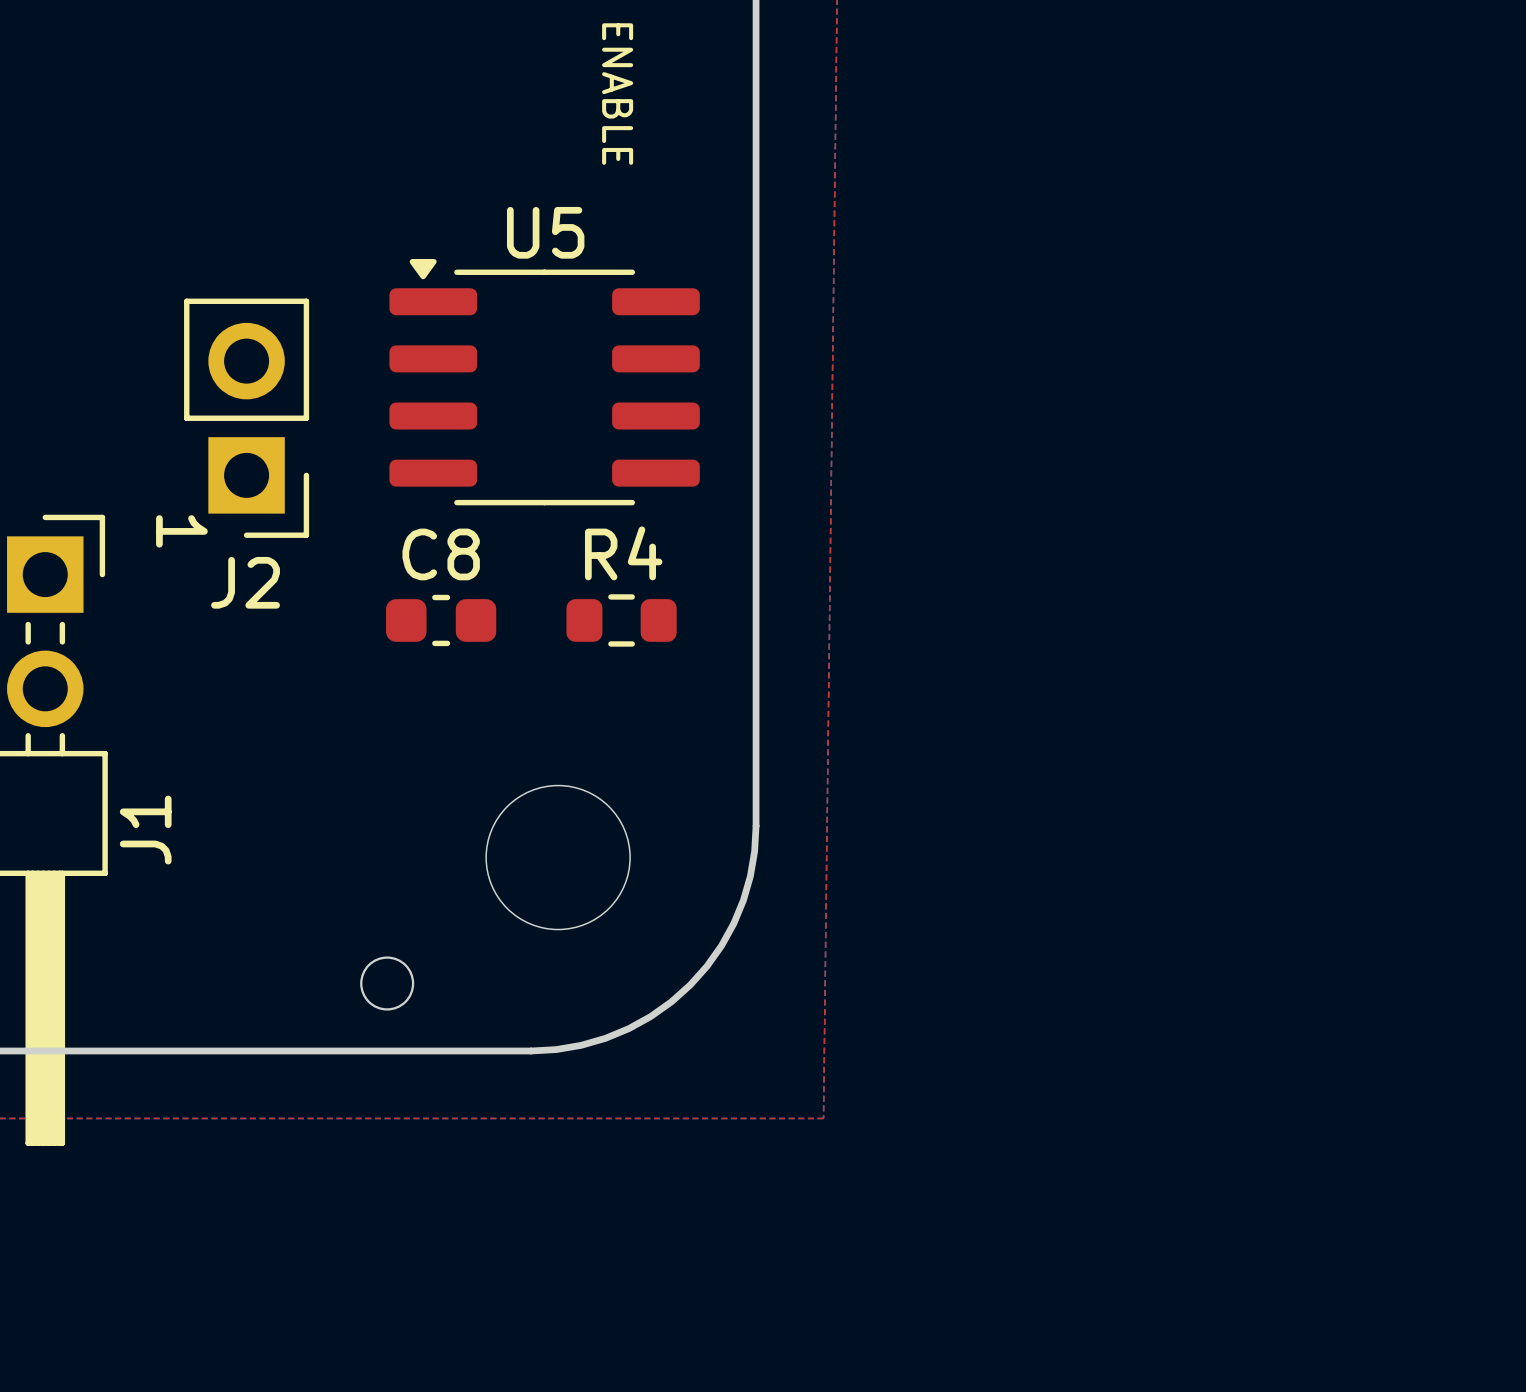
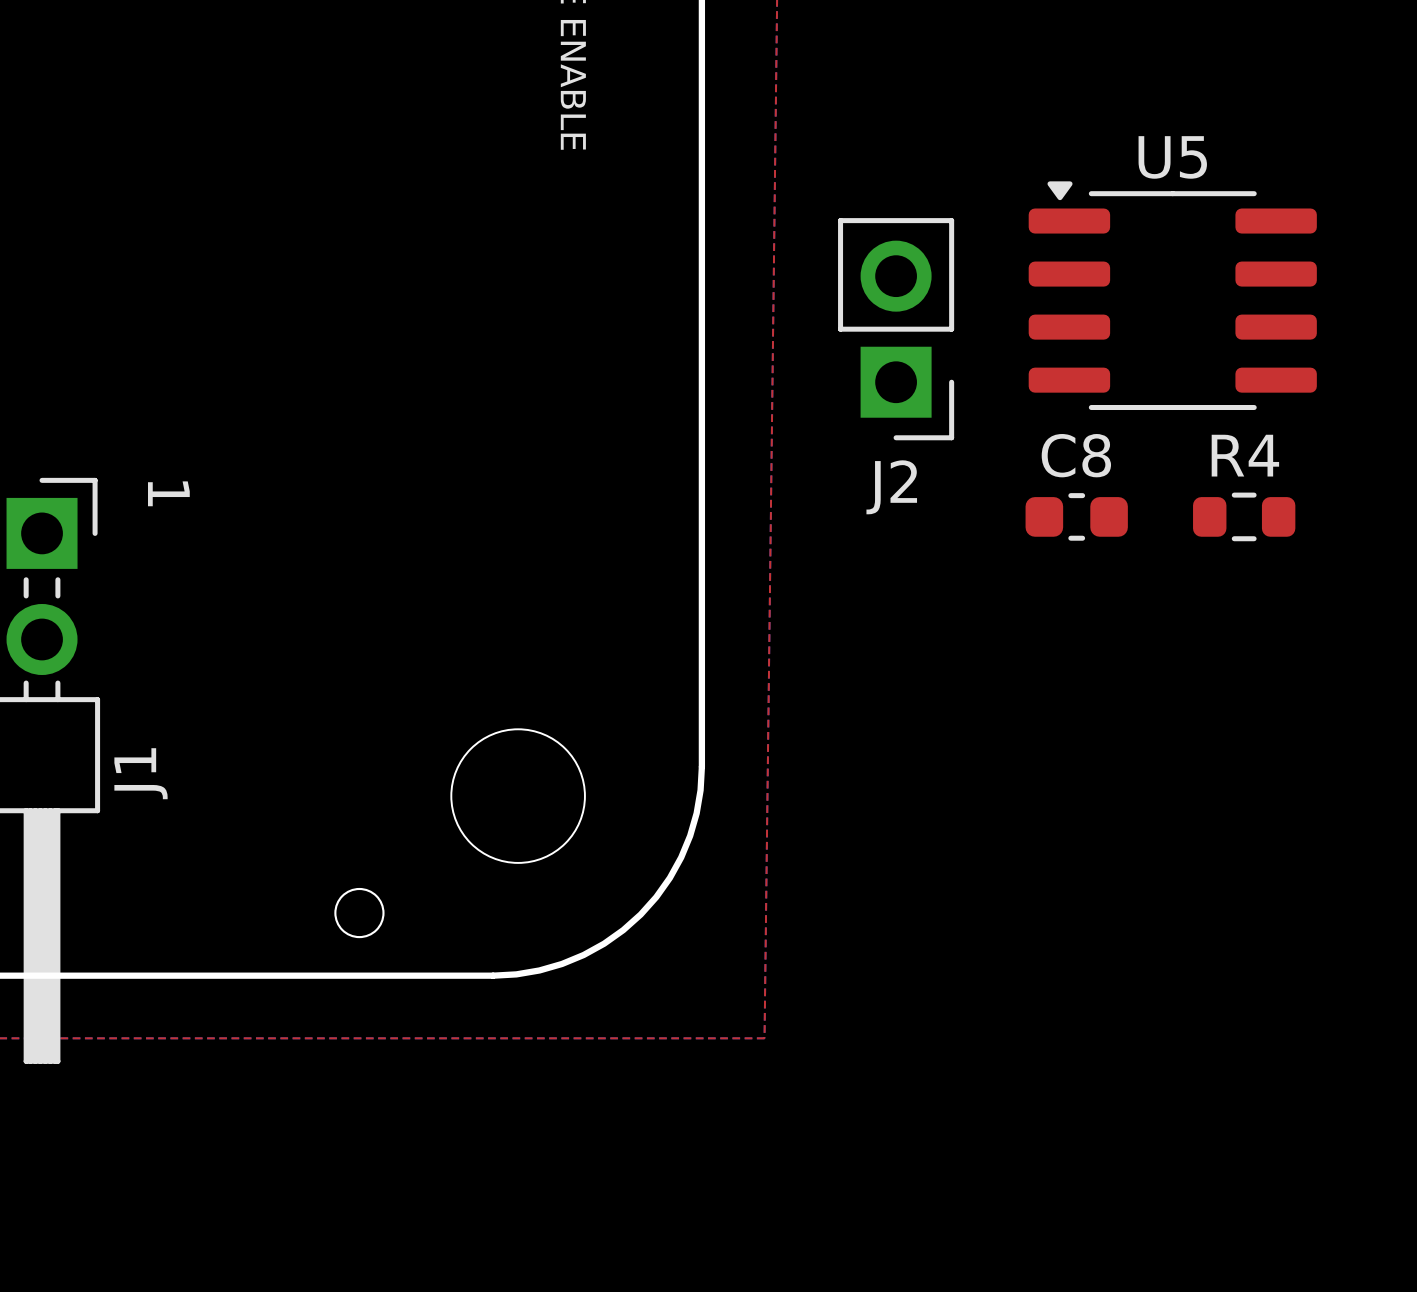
U5 position: (544, 382) -> (1172, 295)
J2 position: (246, 418) -> (896, 329)
C8 position: (441, 620) -> (1076, 516)
R4 position: (621, 620) -> (1244, 516)

